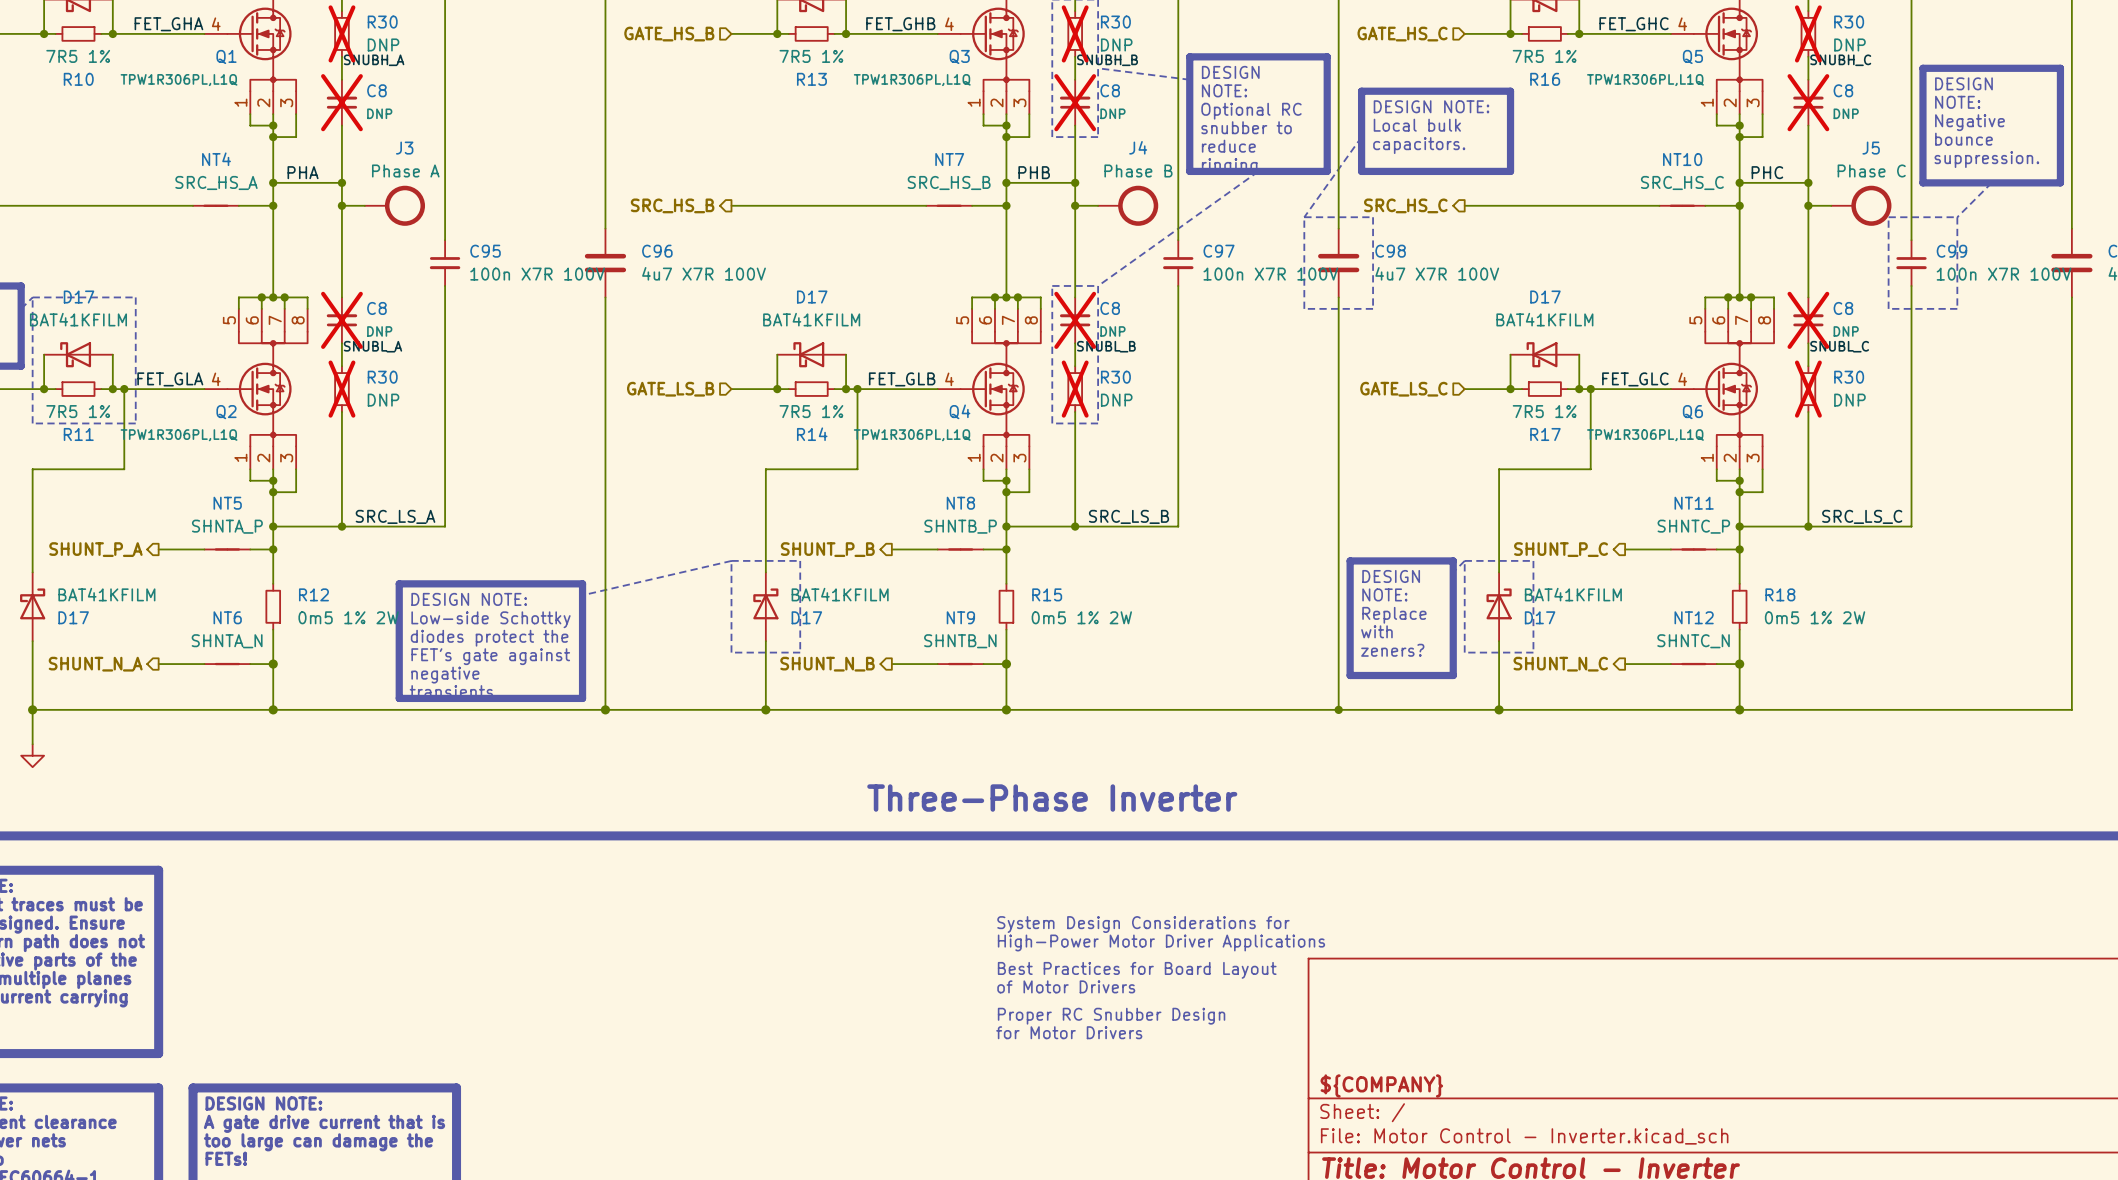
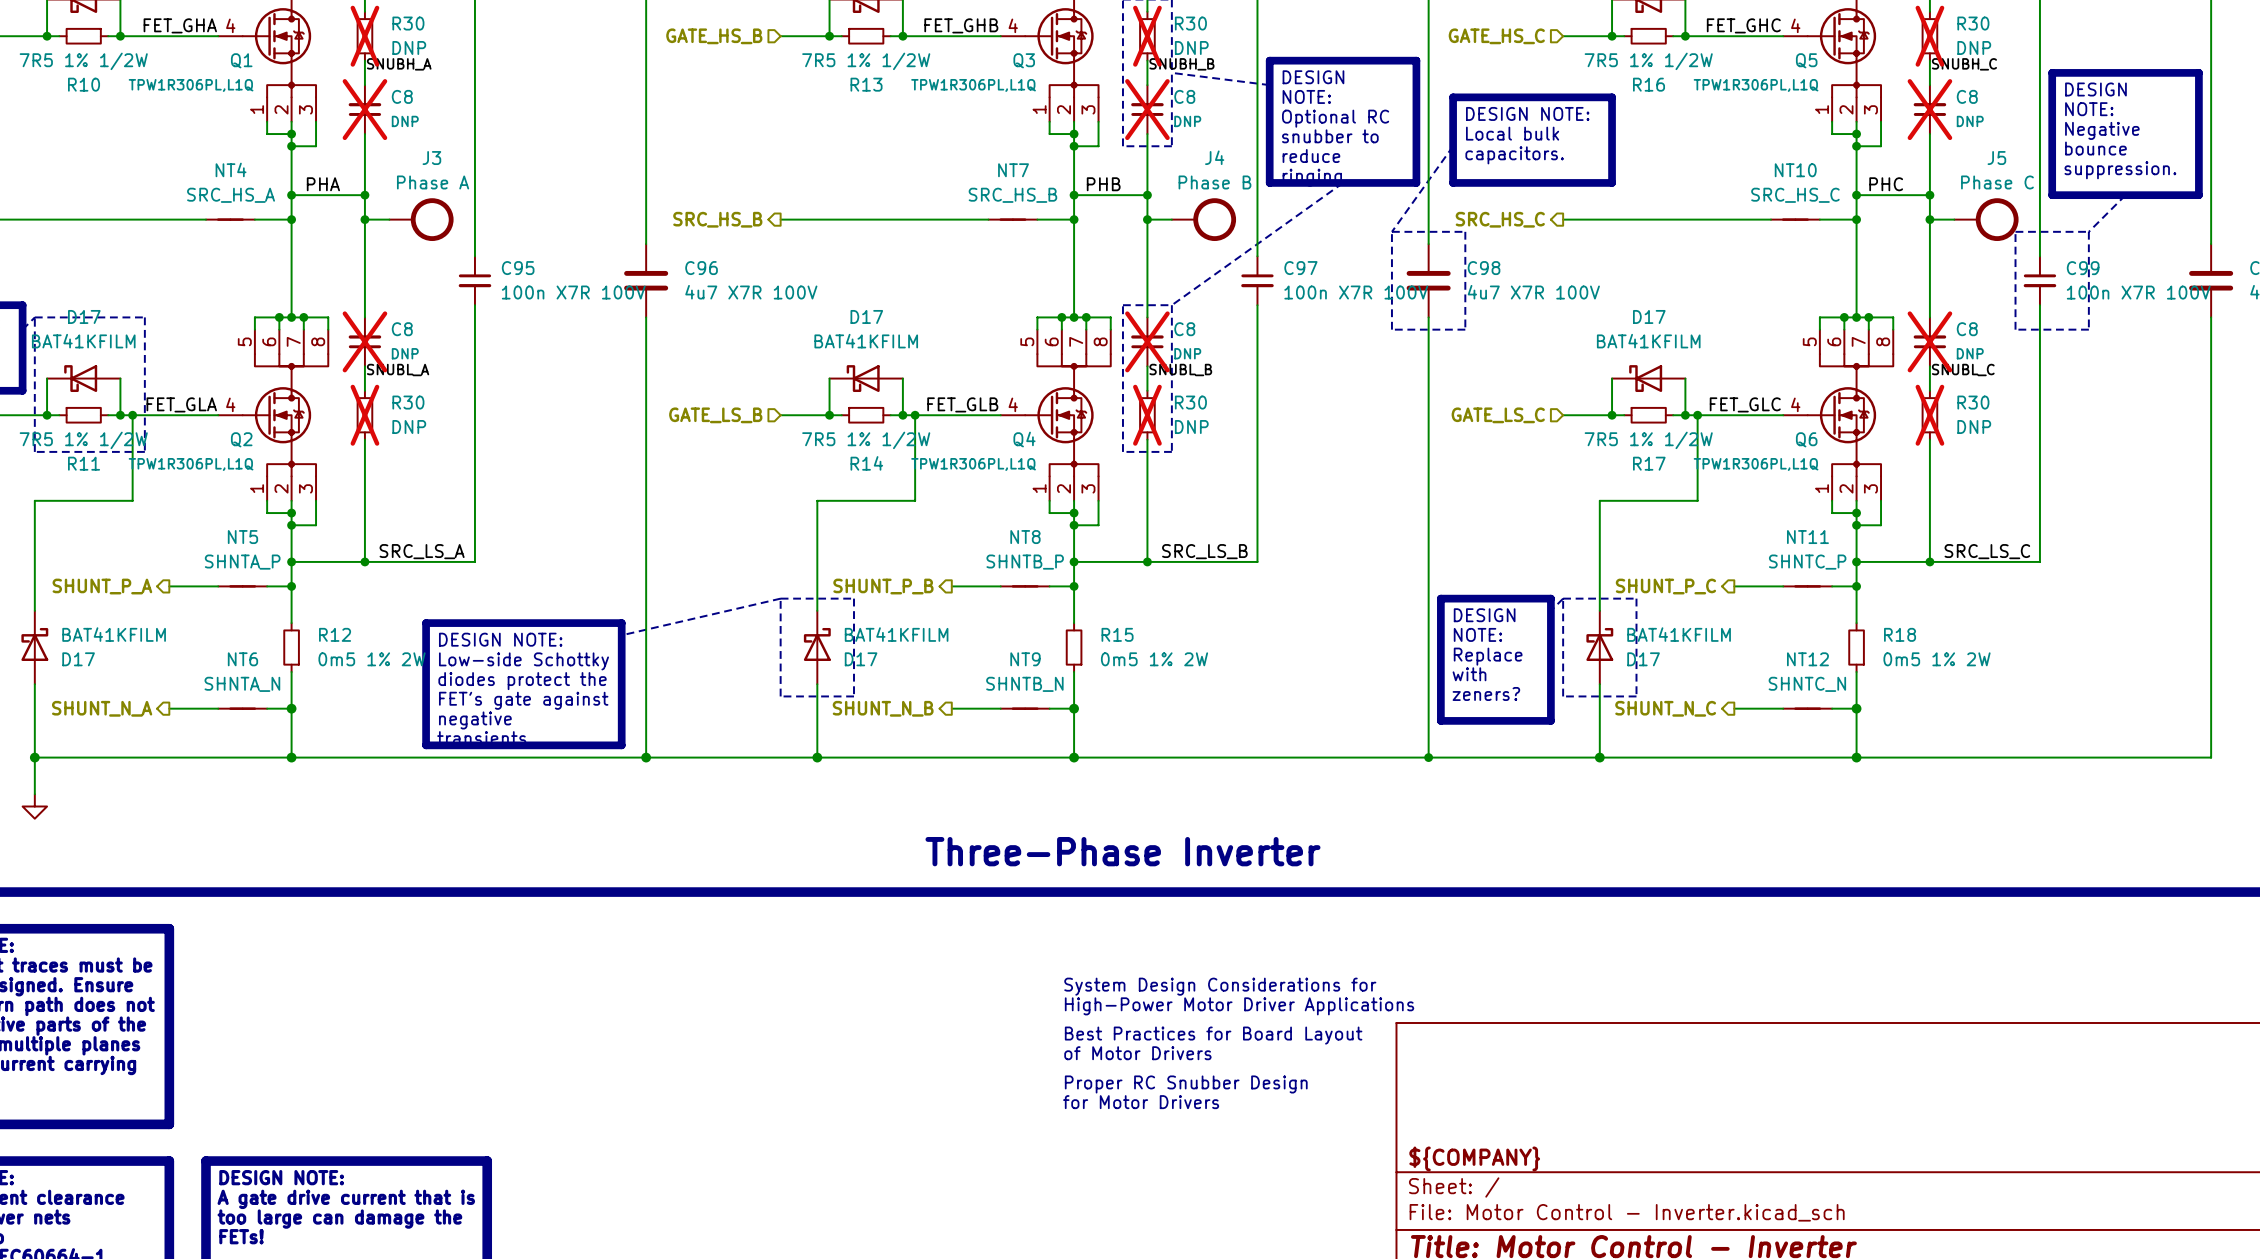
R10 value: 7R5 1% (78, 56) -> 7R5 1% 1/2W (83, 61)
R13 value: 7R5 1% (811, 56) -> 7R5 1% 1/2W (866, 61)
R16 value: 7R5 1% (1544, 56) -> 7R5 1% 1/2W (1648, 61)
R11 value: 7R5 1% (78, 411) -> 7R5 1% 1/2W (83, 440)
R14 value: 7R5 1% (811, 411) -> 7R5 1% 1/2W (866, 440)
R17 value: 7R5 1% (1544, 411) -> 7R5 1% 1/2W (1648, 440)

